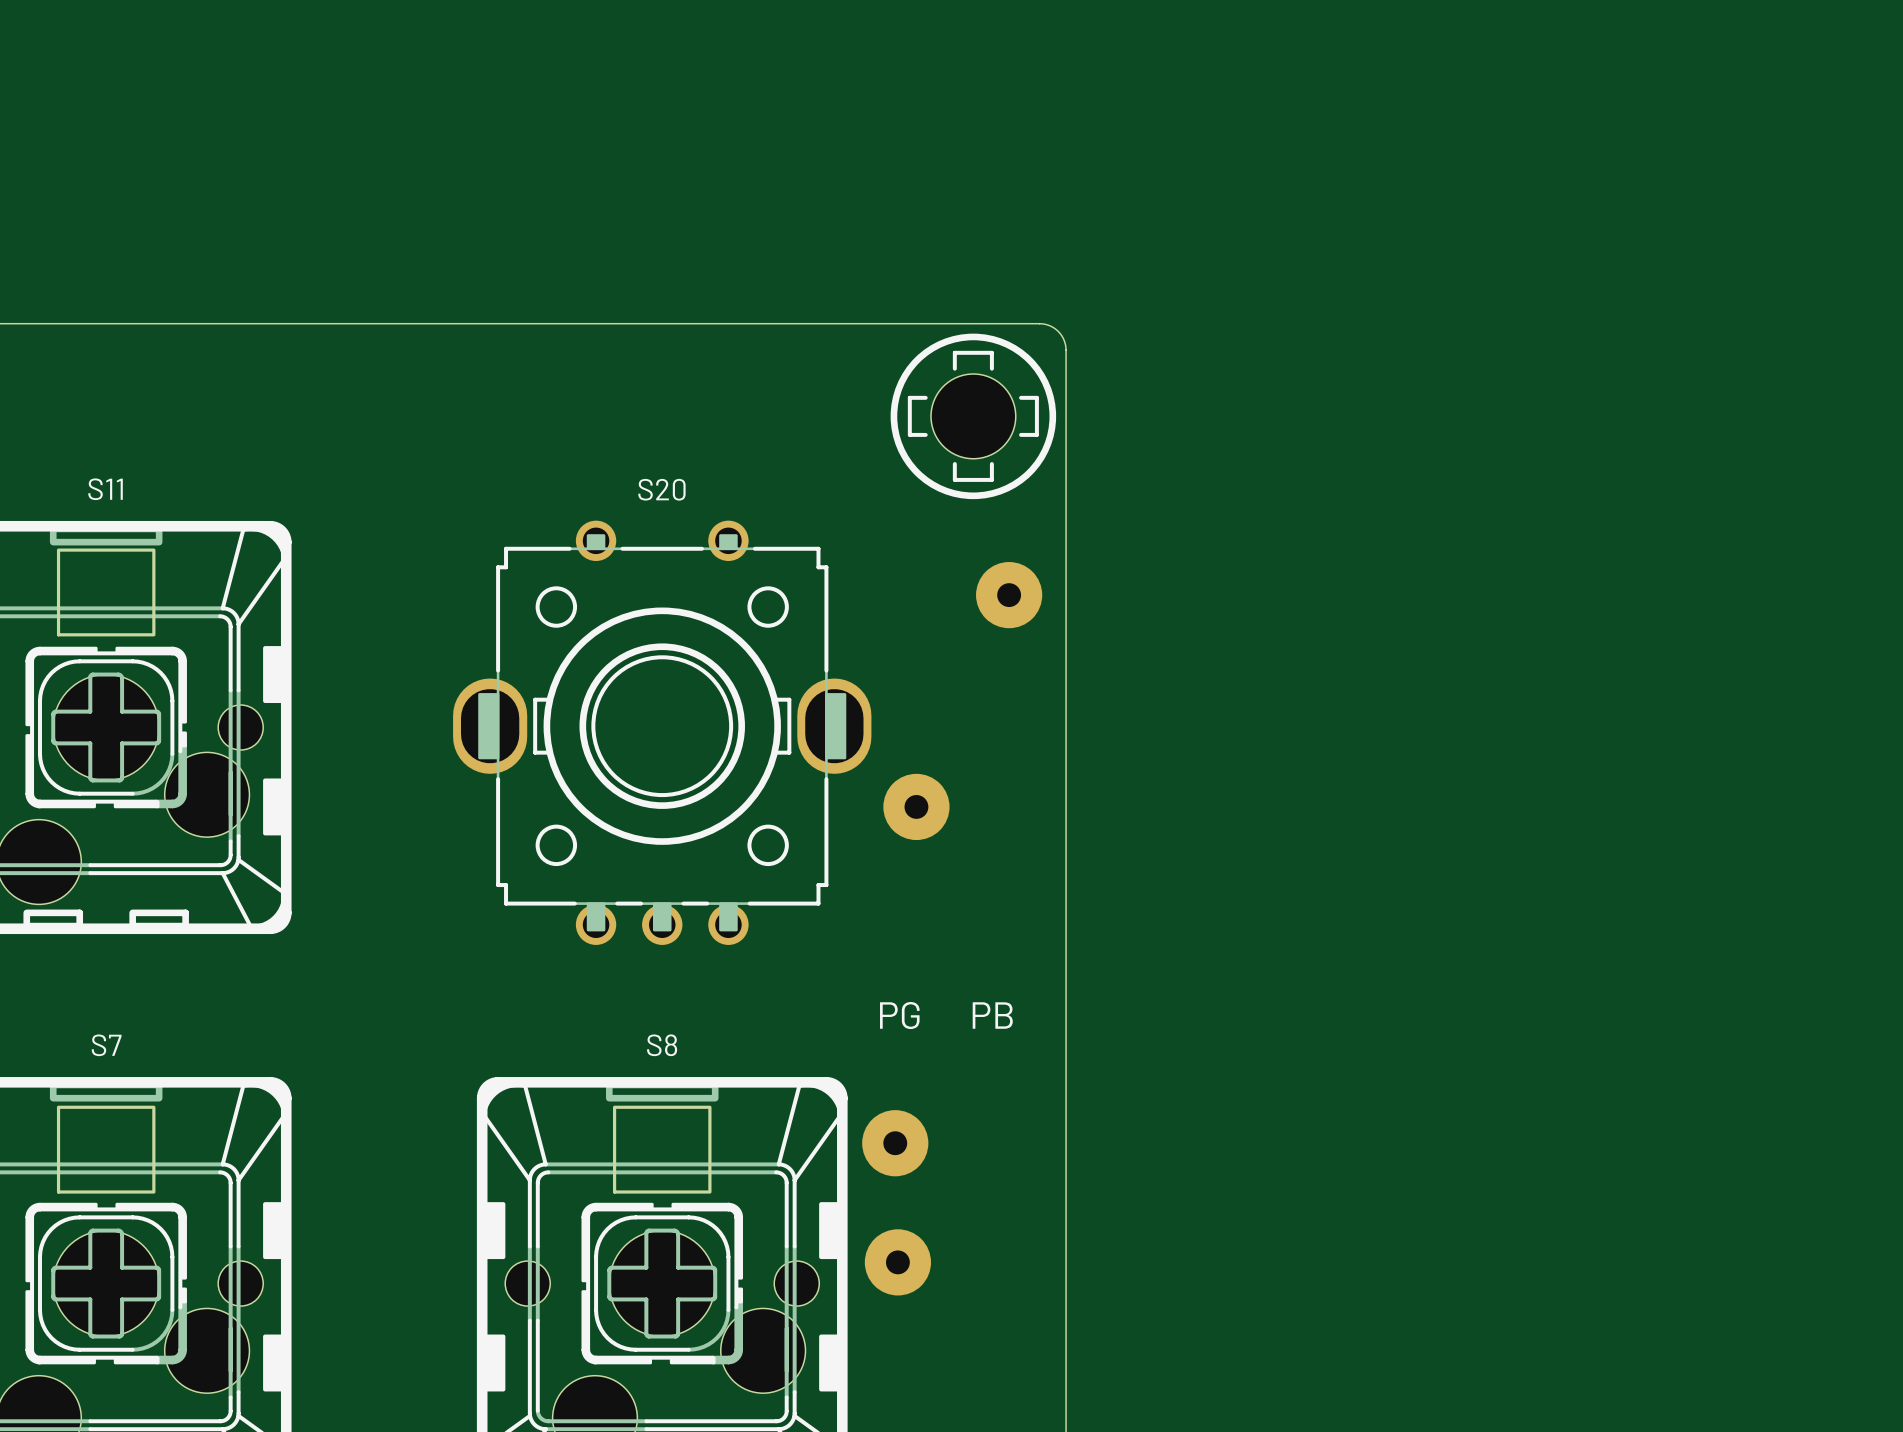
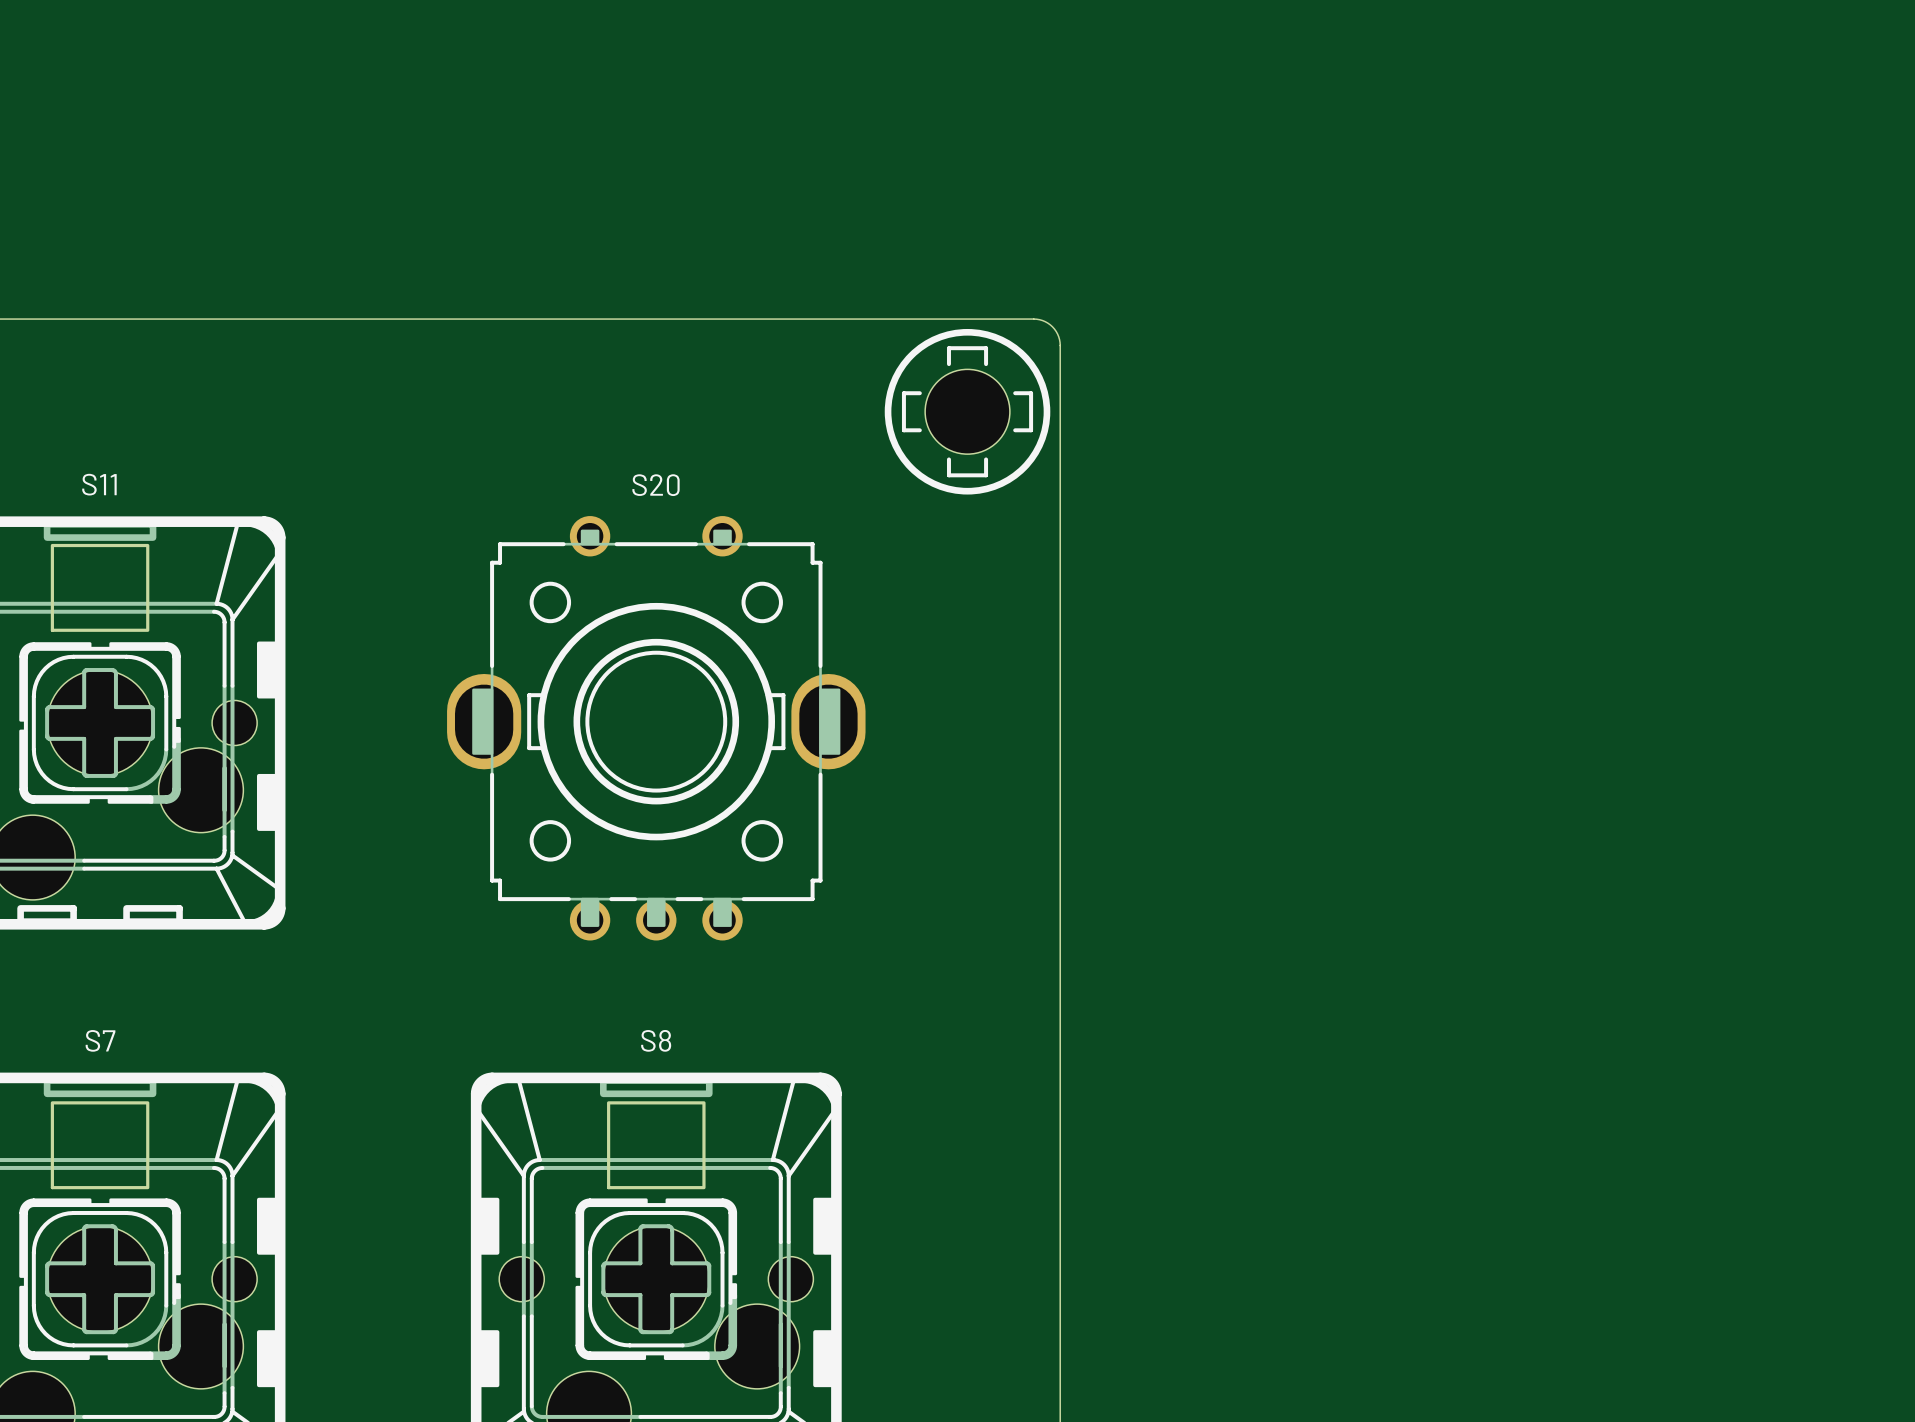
part: (1009, 595) -> none
part: (916, 806) -> none
text: PG (899, 1015) -> none
text: PB (992, 1015) -> none
part: (895, 1143) -> none
part: (897, 1262) -> none

